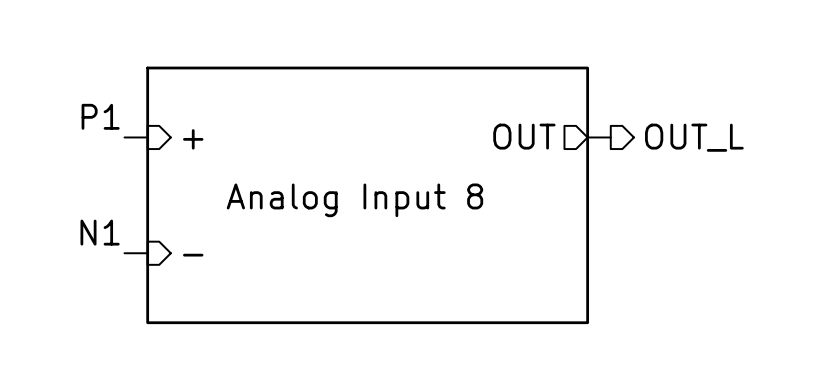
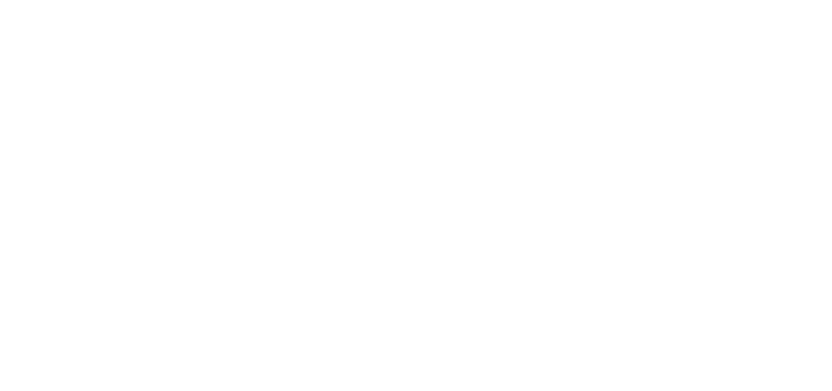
label: P1 (100, 116) -> none
sheet pin: OUT (524, 136) -> none
wire: (124, 137) (147, 137) -> none
wire: (587, 137) (610, 137) -> none
hierarchical label: OUT_L (694, 137) -> none
sheet pin: + (193, 139) -> none
sheet Analog Input 8: (367, 195) -> none
label: N1 (100, 232) -> none
wire: (124, 253) (147, 253) -> none
sheet pin: - (193, 255) -> none

